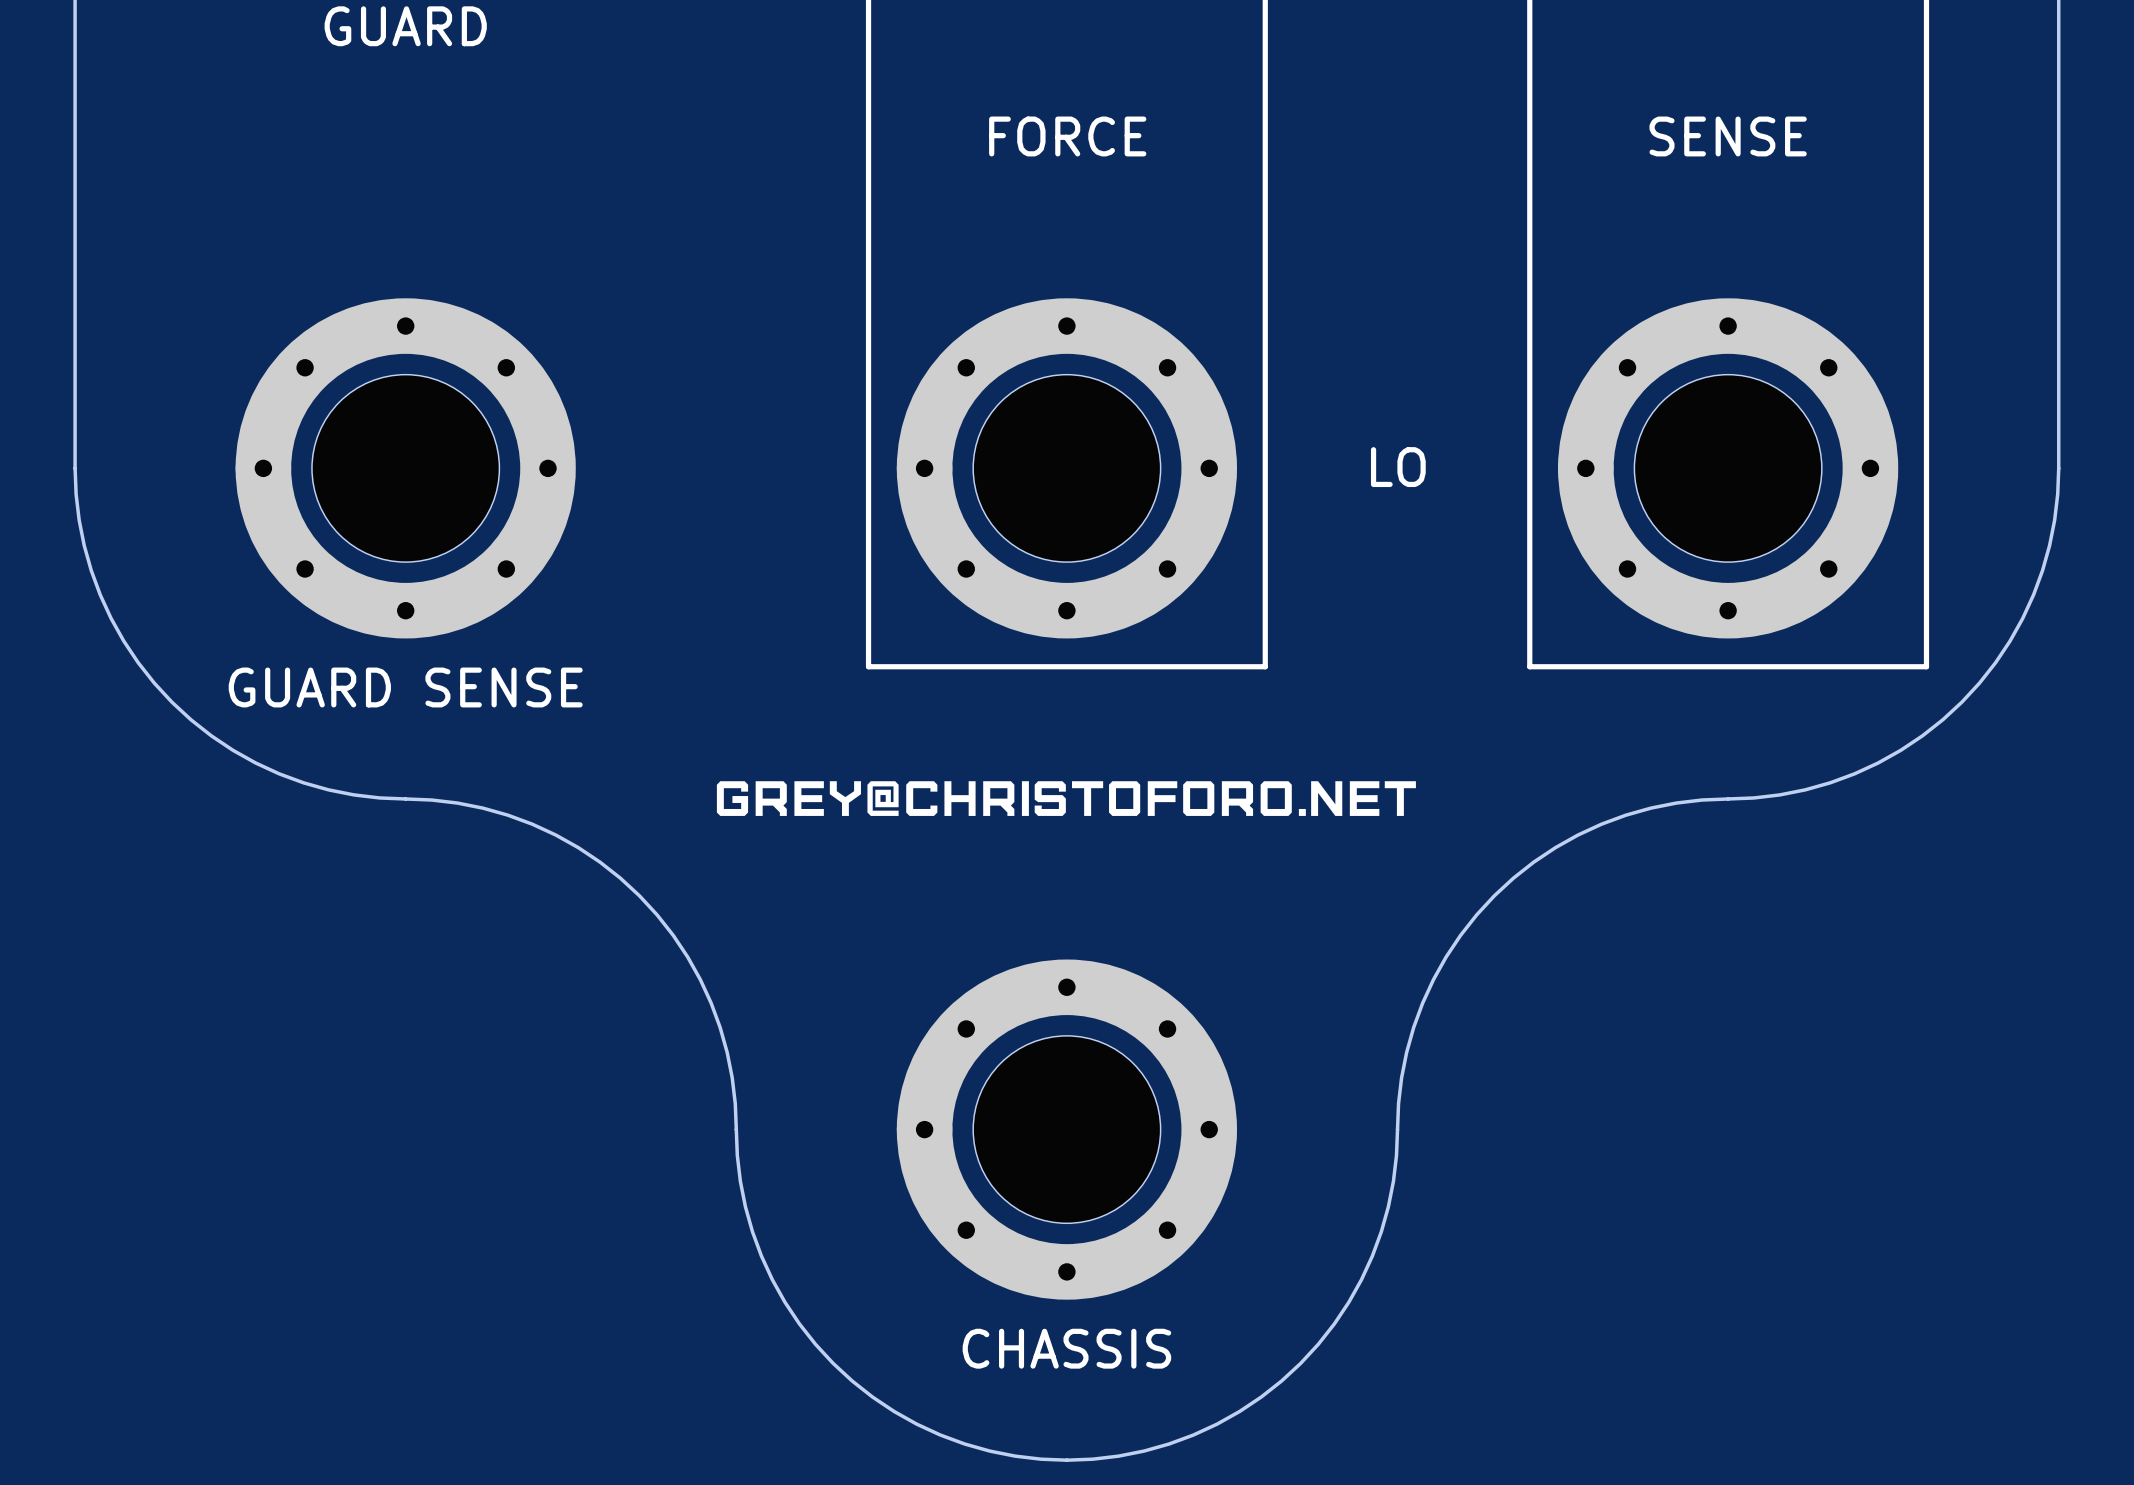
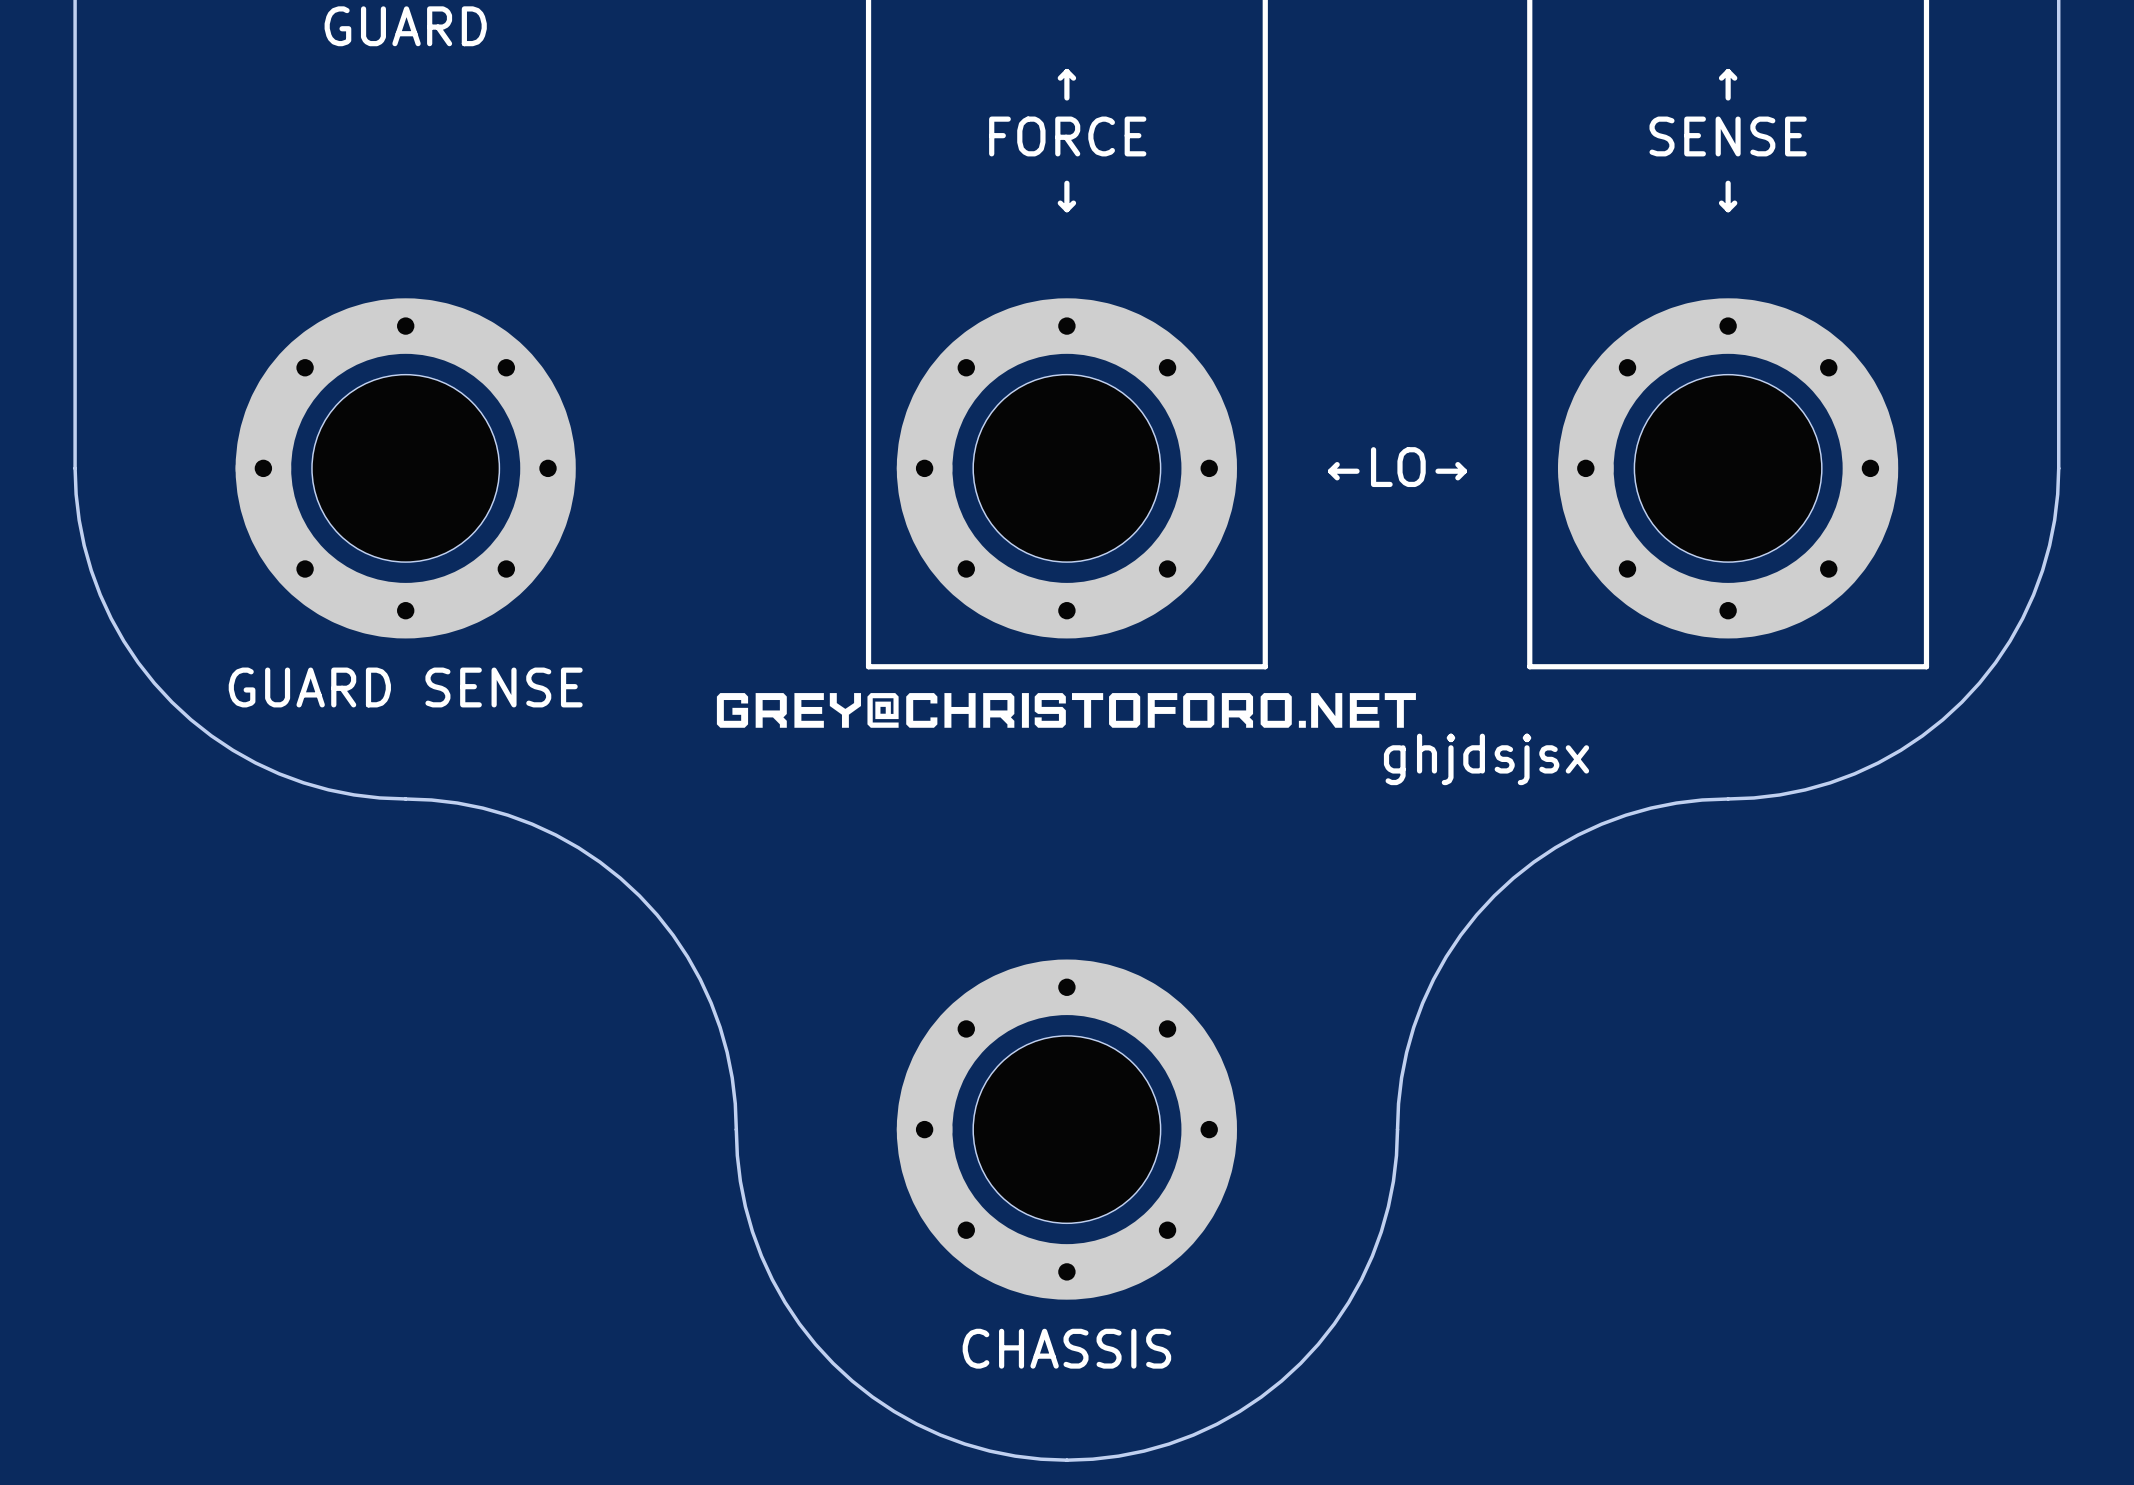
text: none -> ↑ (1066, 84)
text: none -> ↑ (1728, 84)
text: none -> ↓ (1066, 196)
text: none -> ↓ (1728, 196)
text: LO (1398, 467) -> ←LO→ (1397, 467)
text: none -> ghjdsjsx (1486, 759)
drawing position: (1066, 798) -> (1066, 710)

